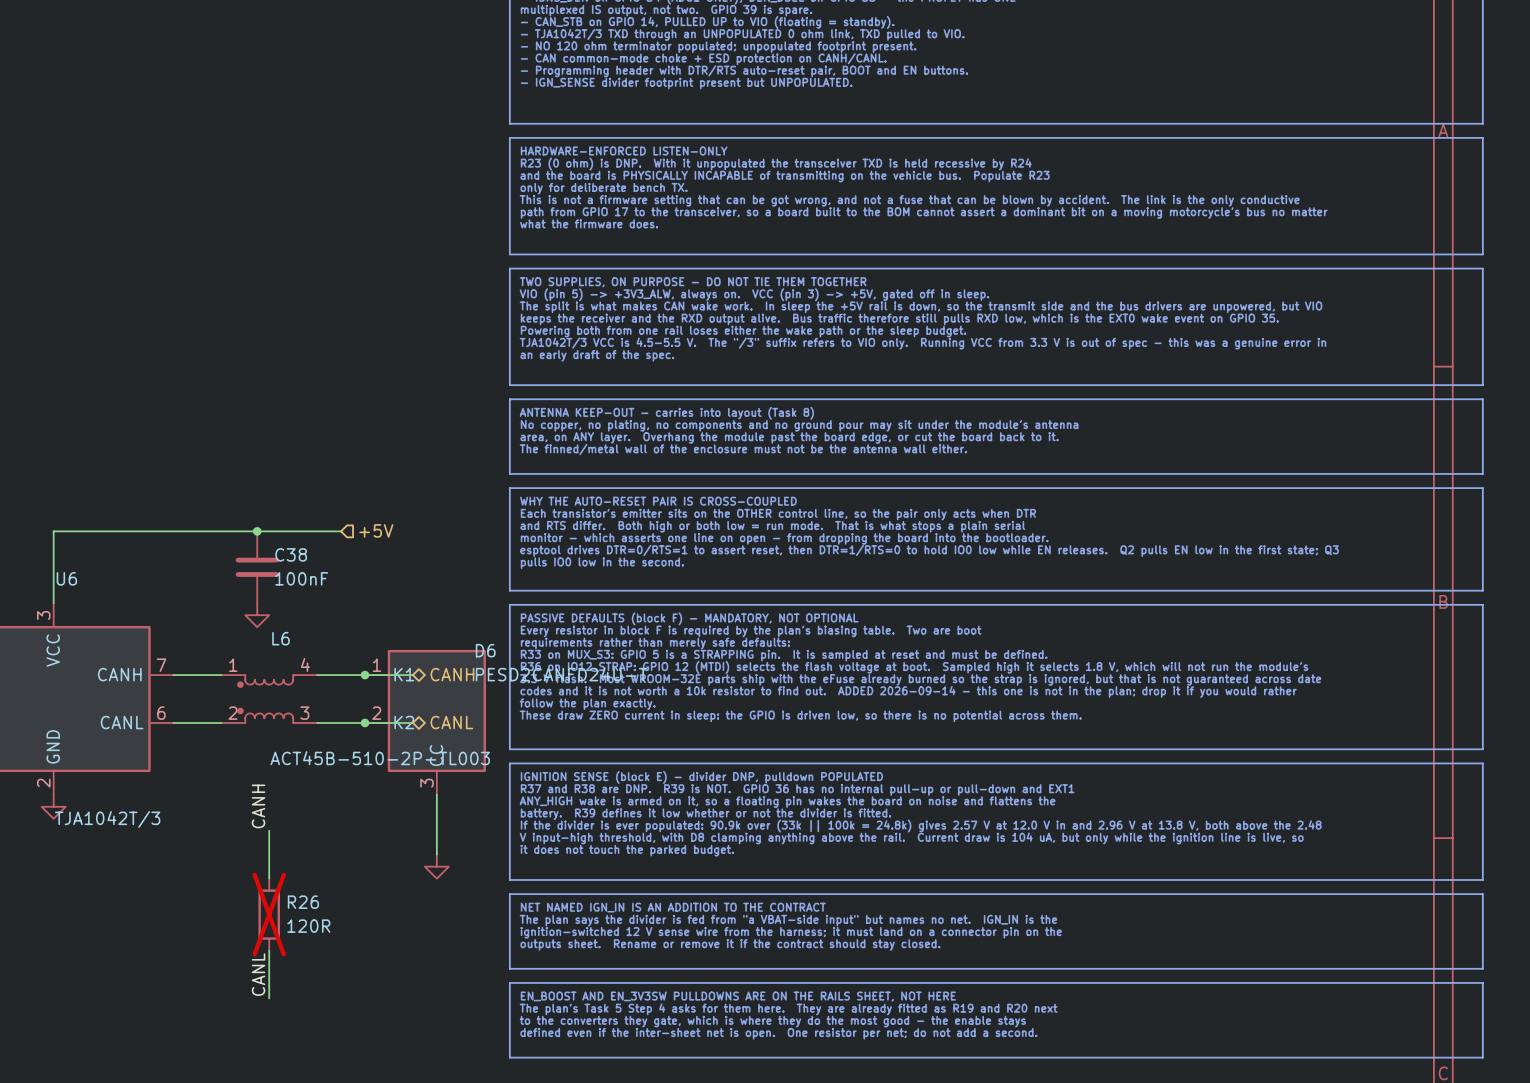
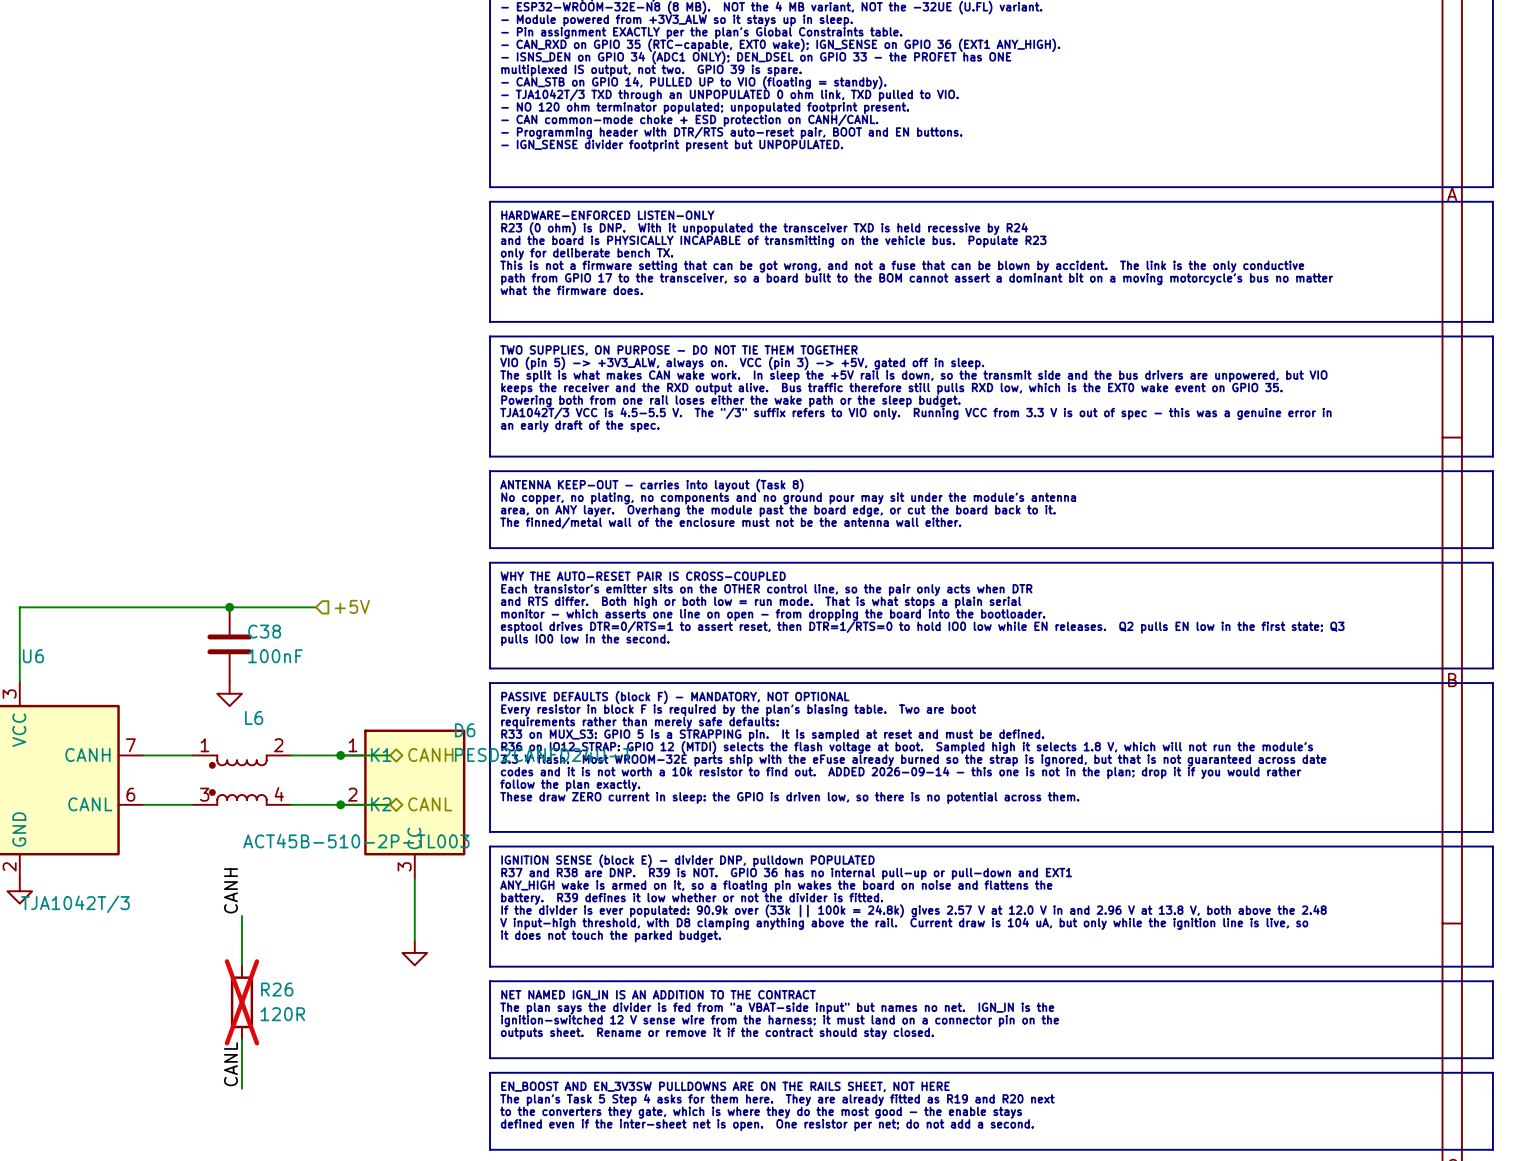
L6 pin number: 4 (305, 664) -> 2 (278, 745)
L6 pin number: 2 (233, 713) -> 3 (204, 794)
L6 pin number: 3 (304, 713) -> 4 (279, 794)

